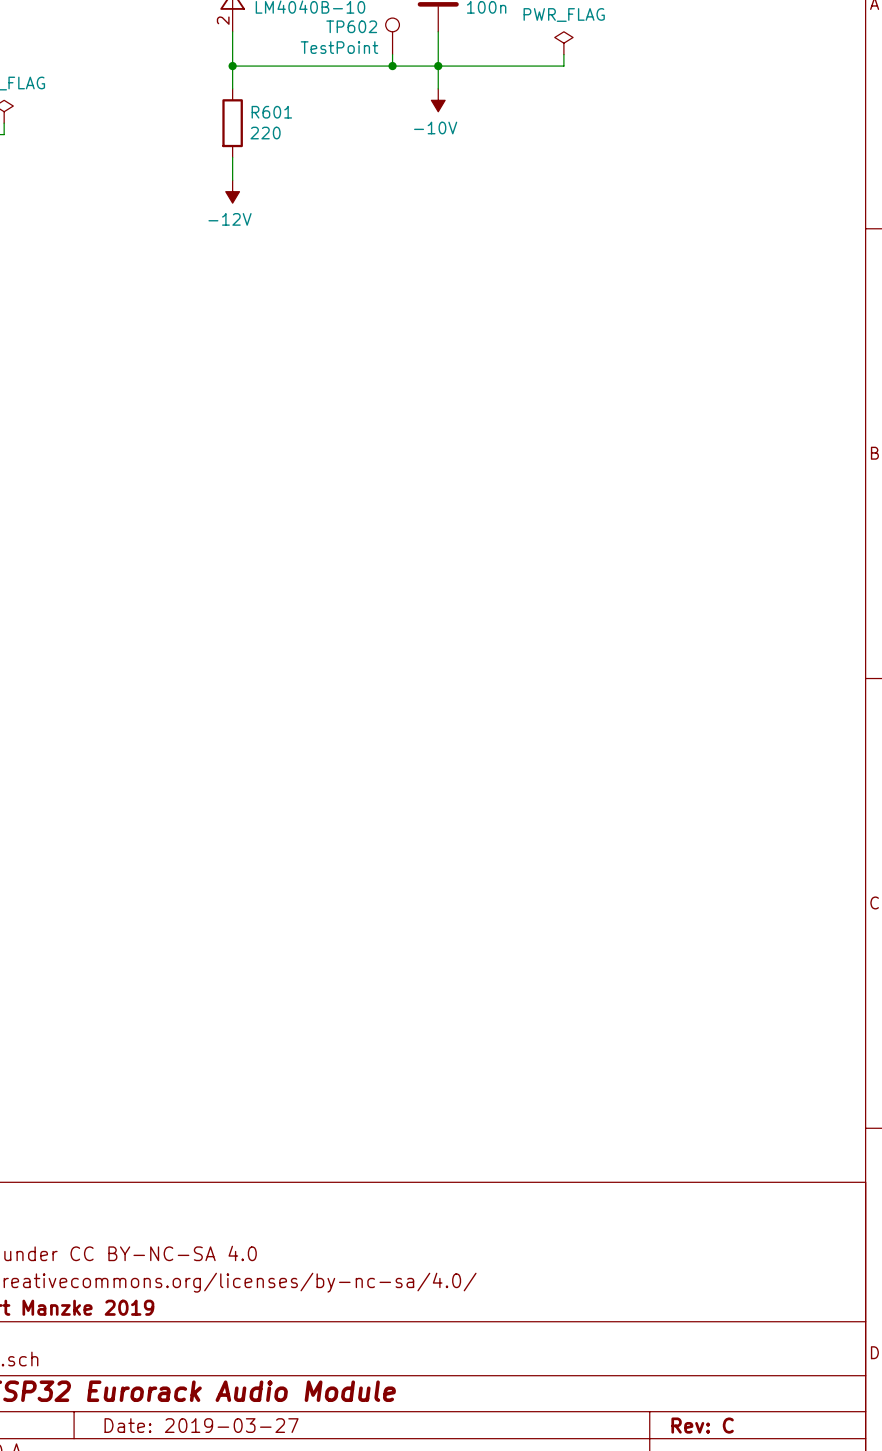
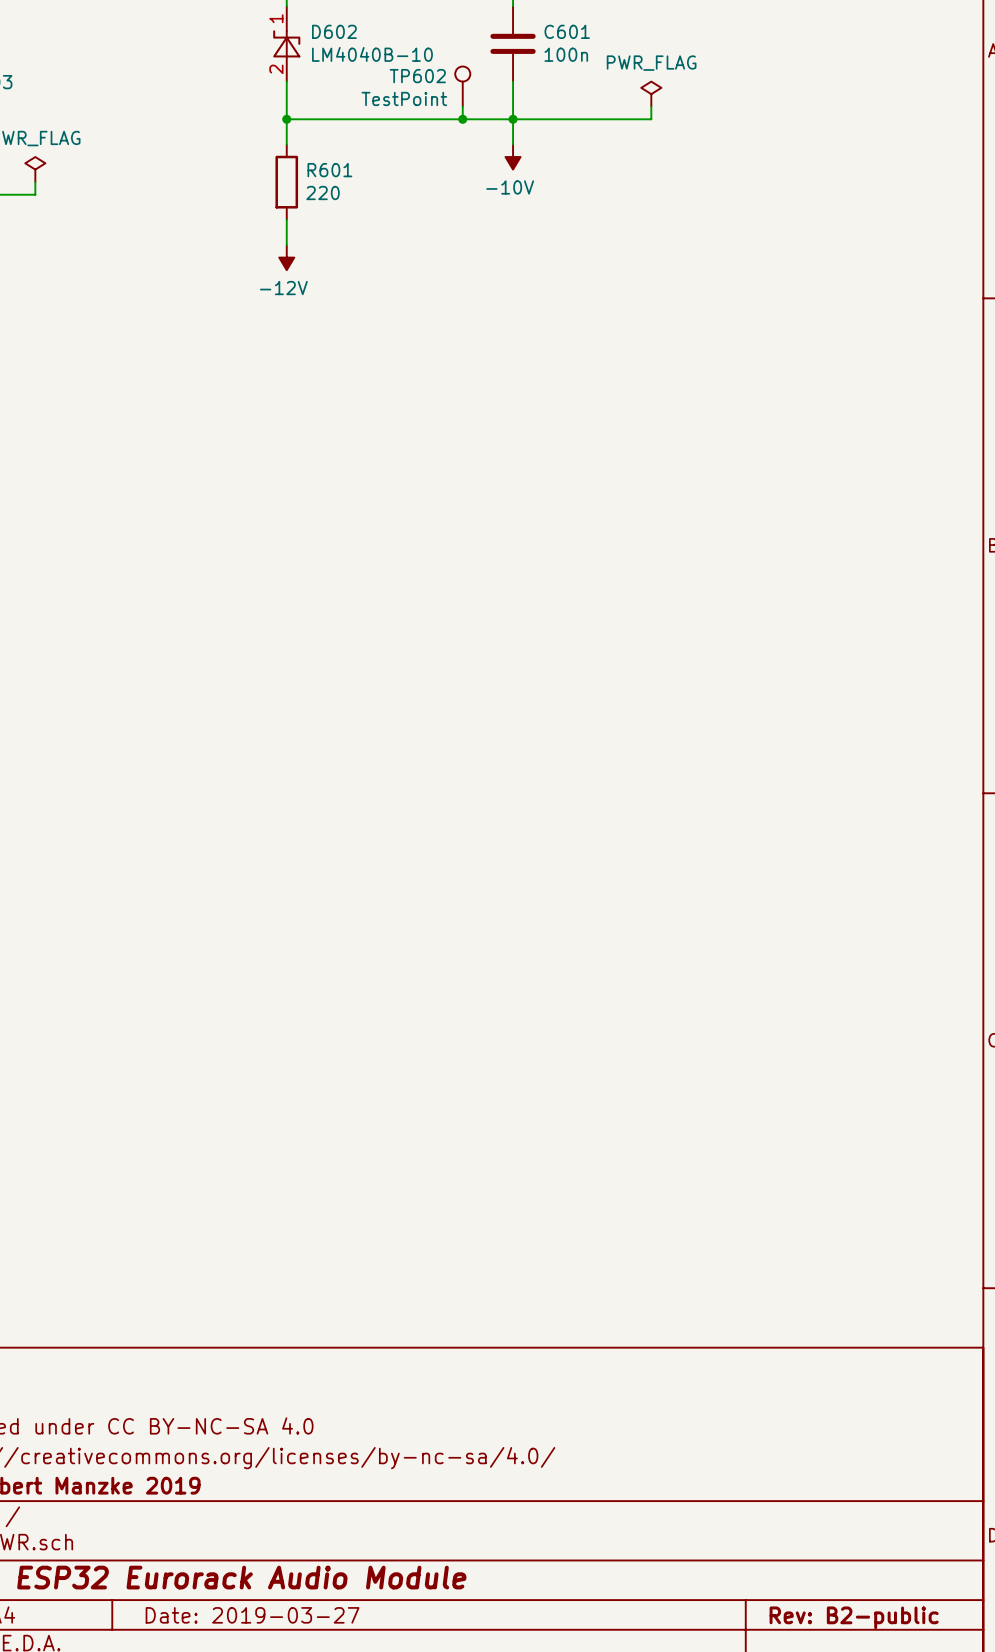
title block: Rev: C (702, 1425) -> Rev: B2-public (854, 1617)

